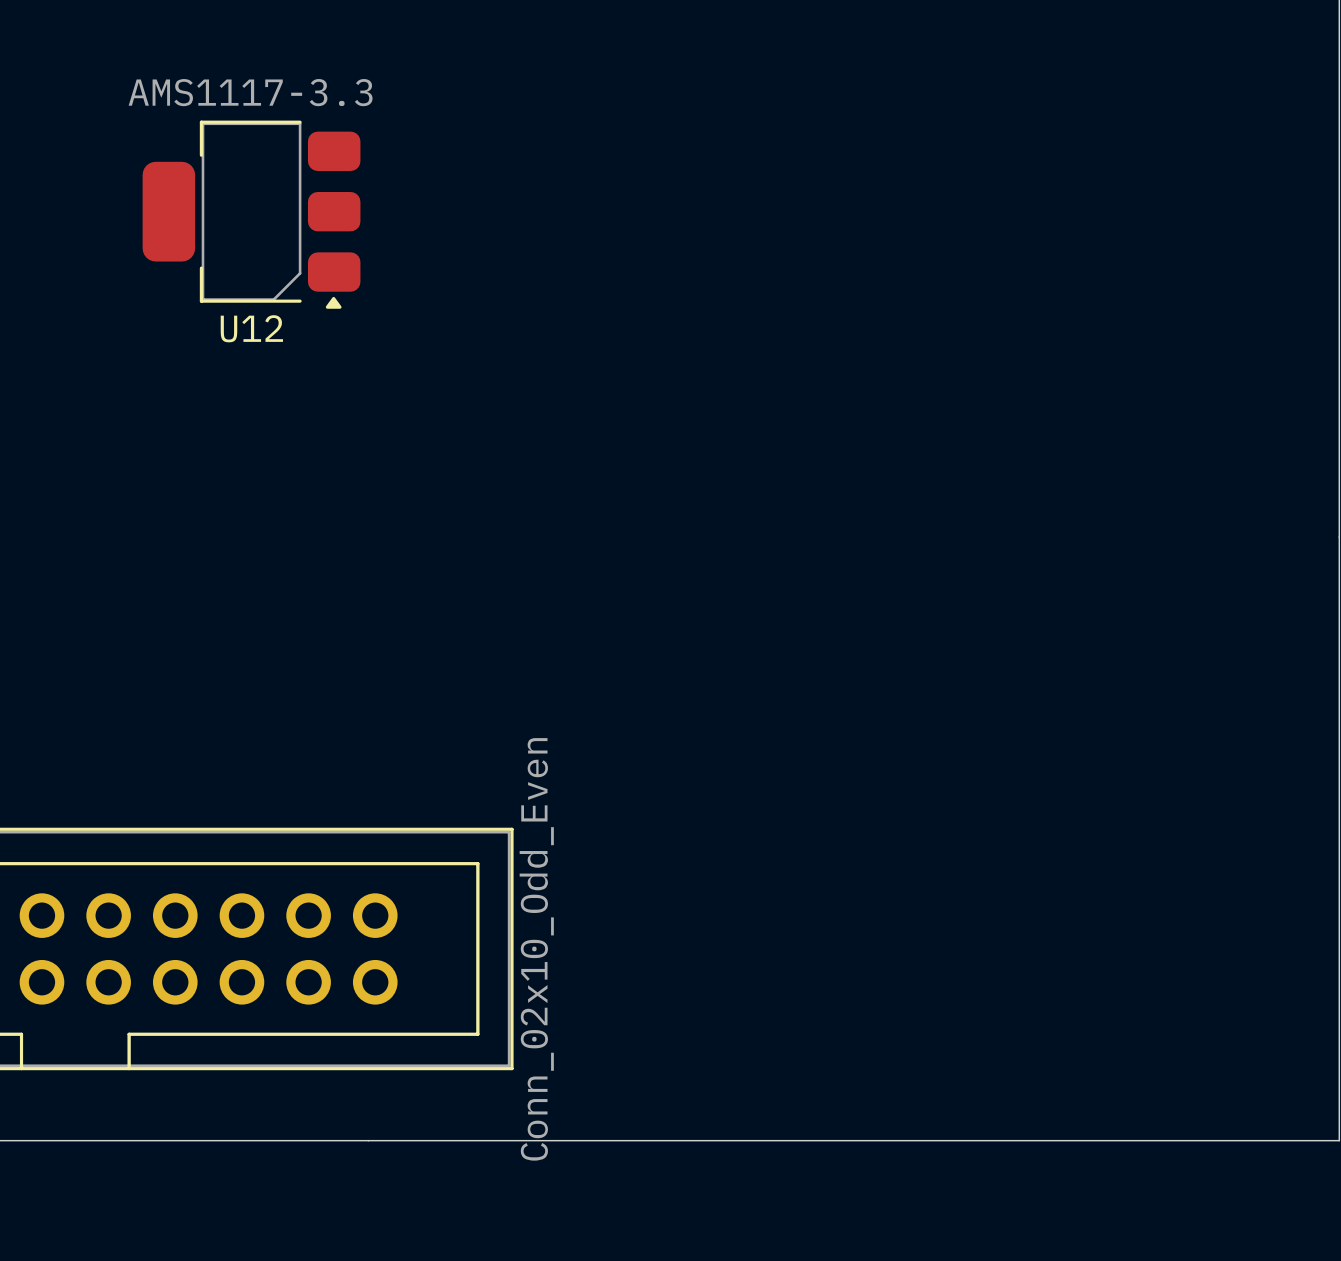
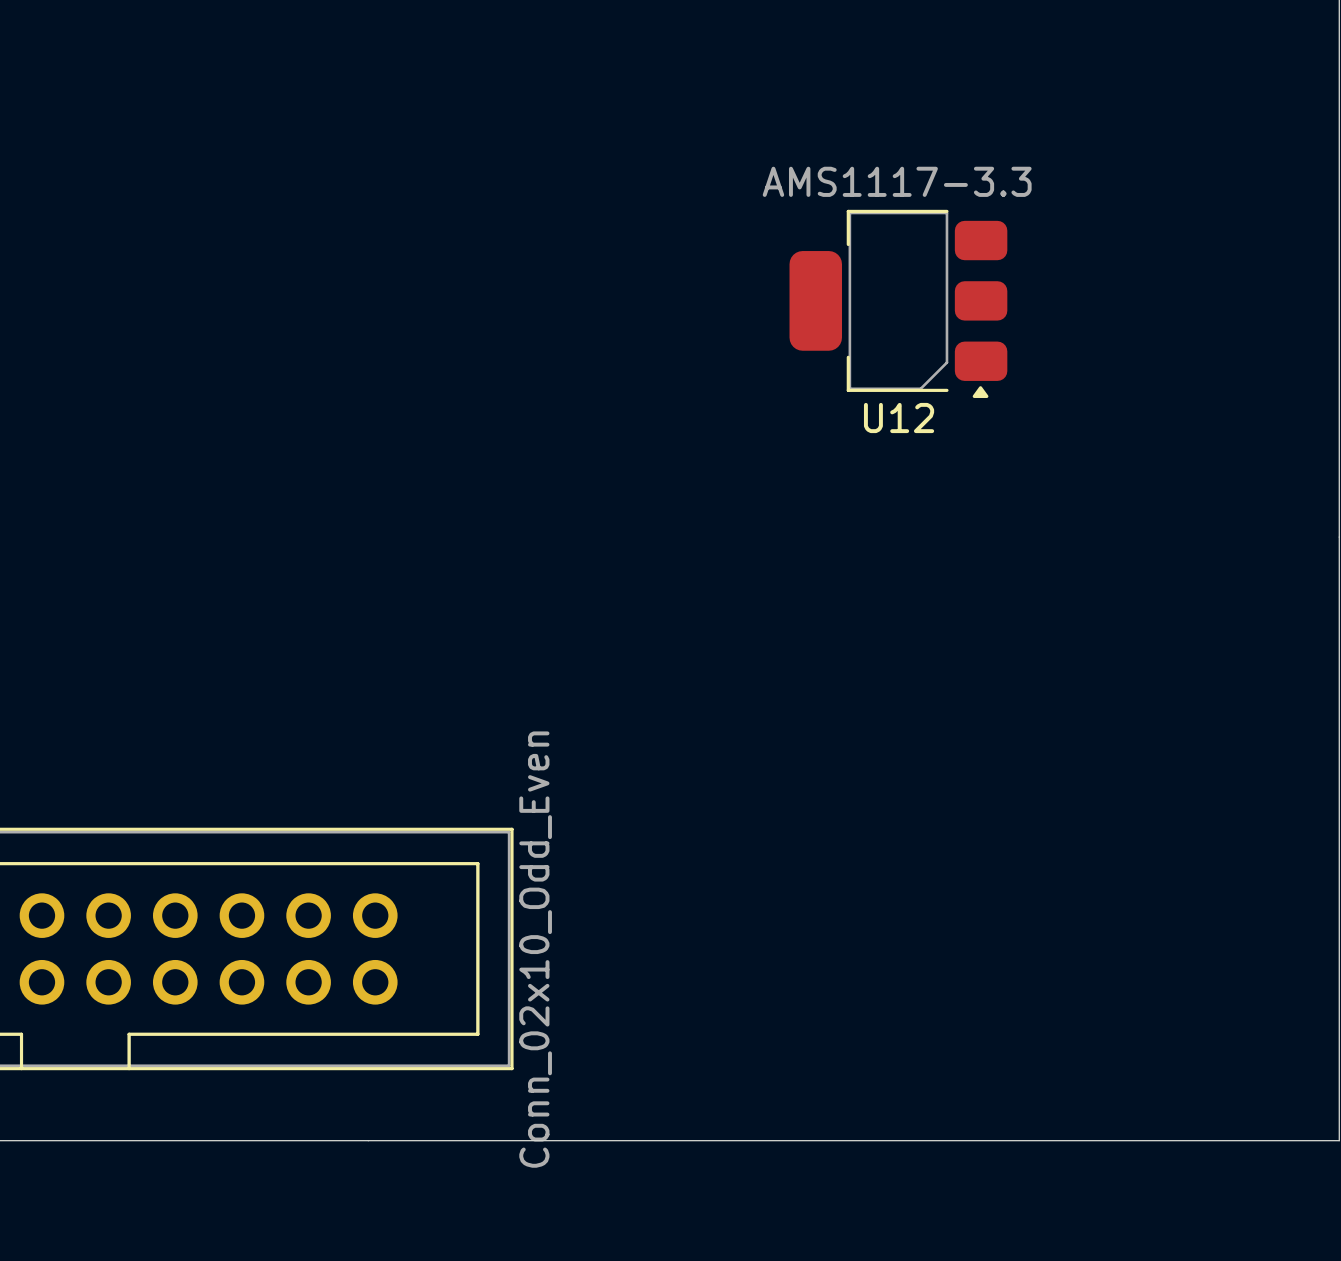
U12 position: (251, 214) -> (898, 303)

